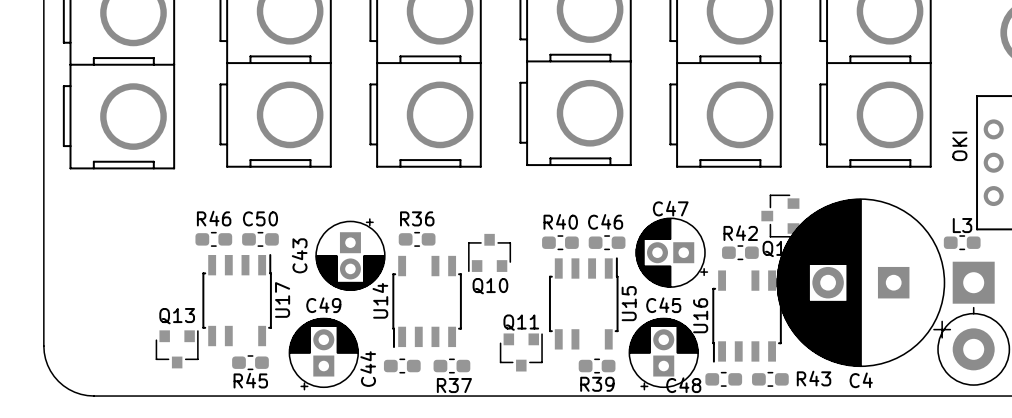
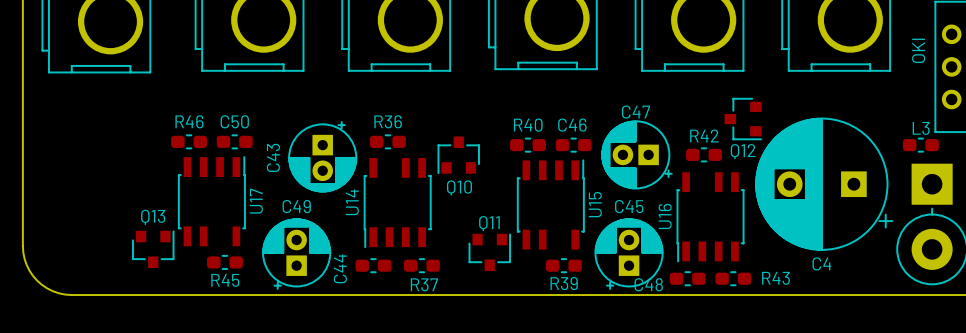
C4 footprint: [776, 198, 952, 368] -> [755, 117, 893, 251]

